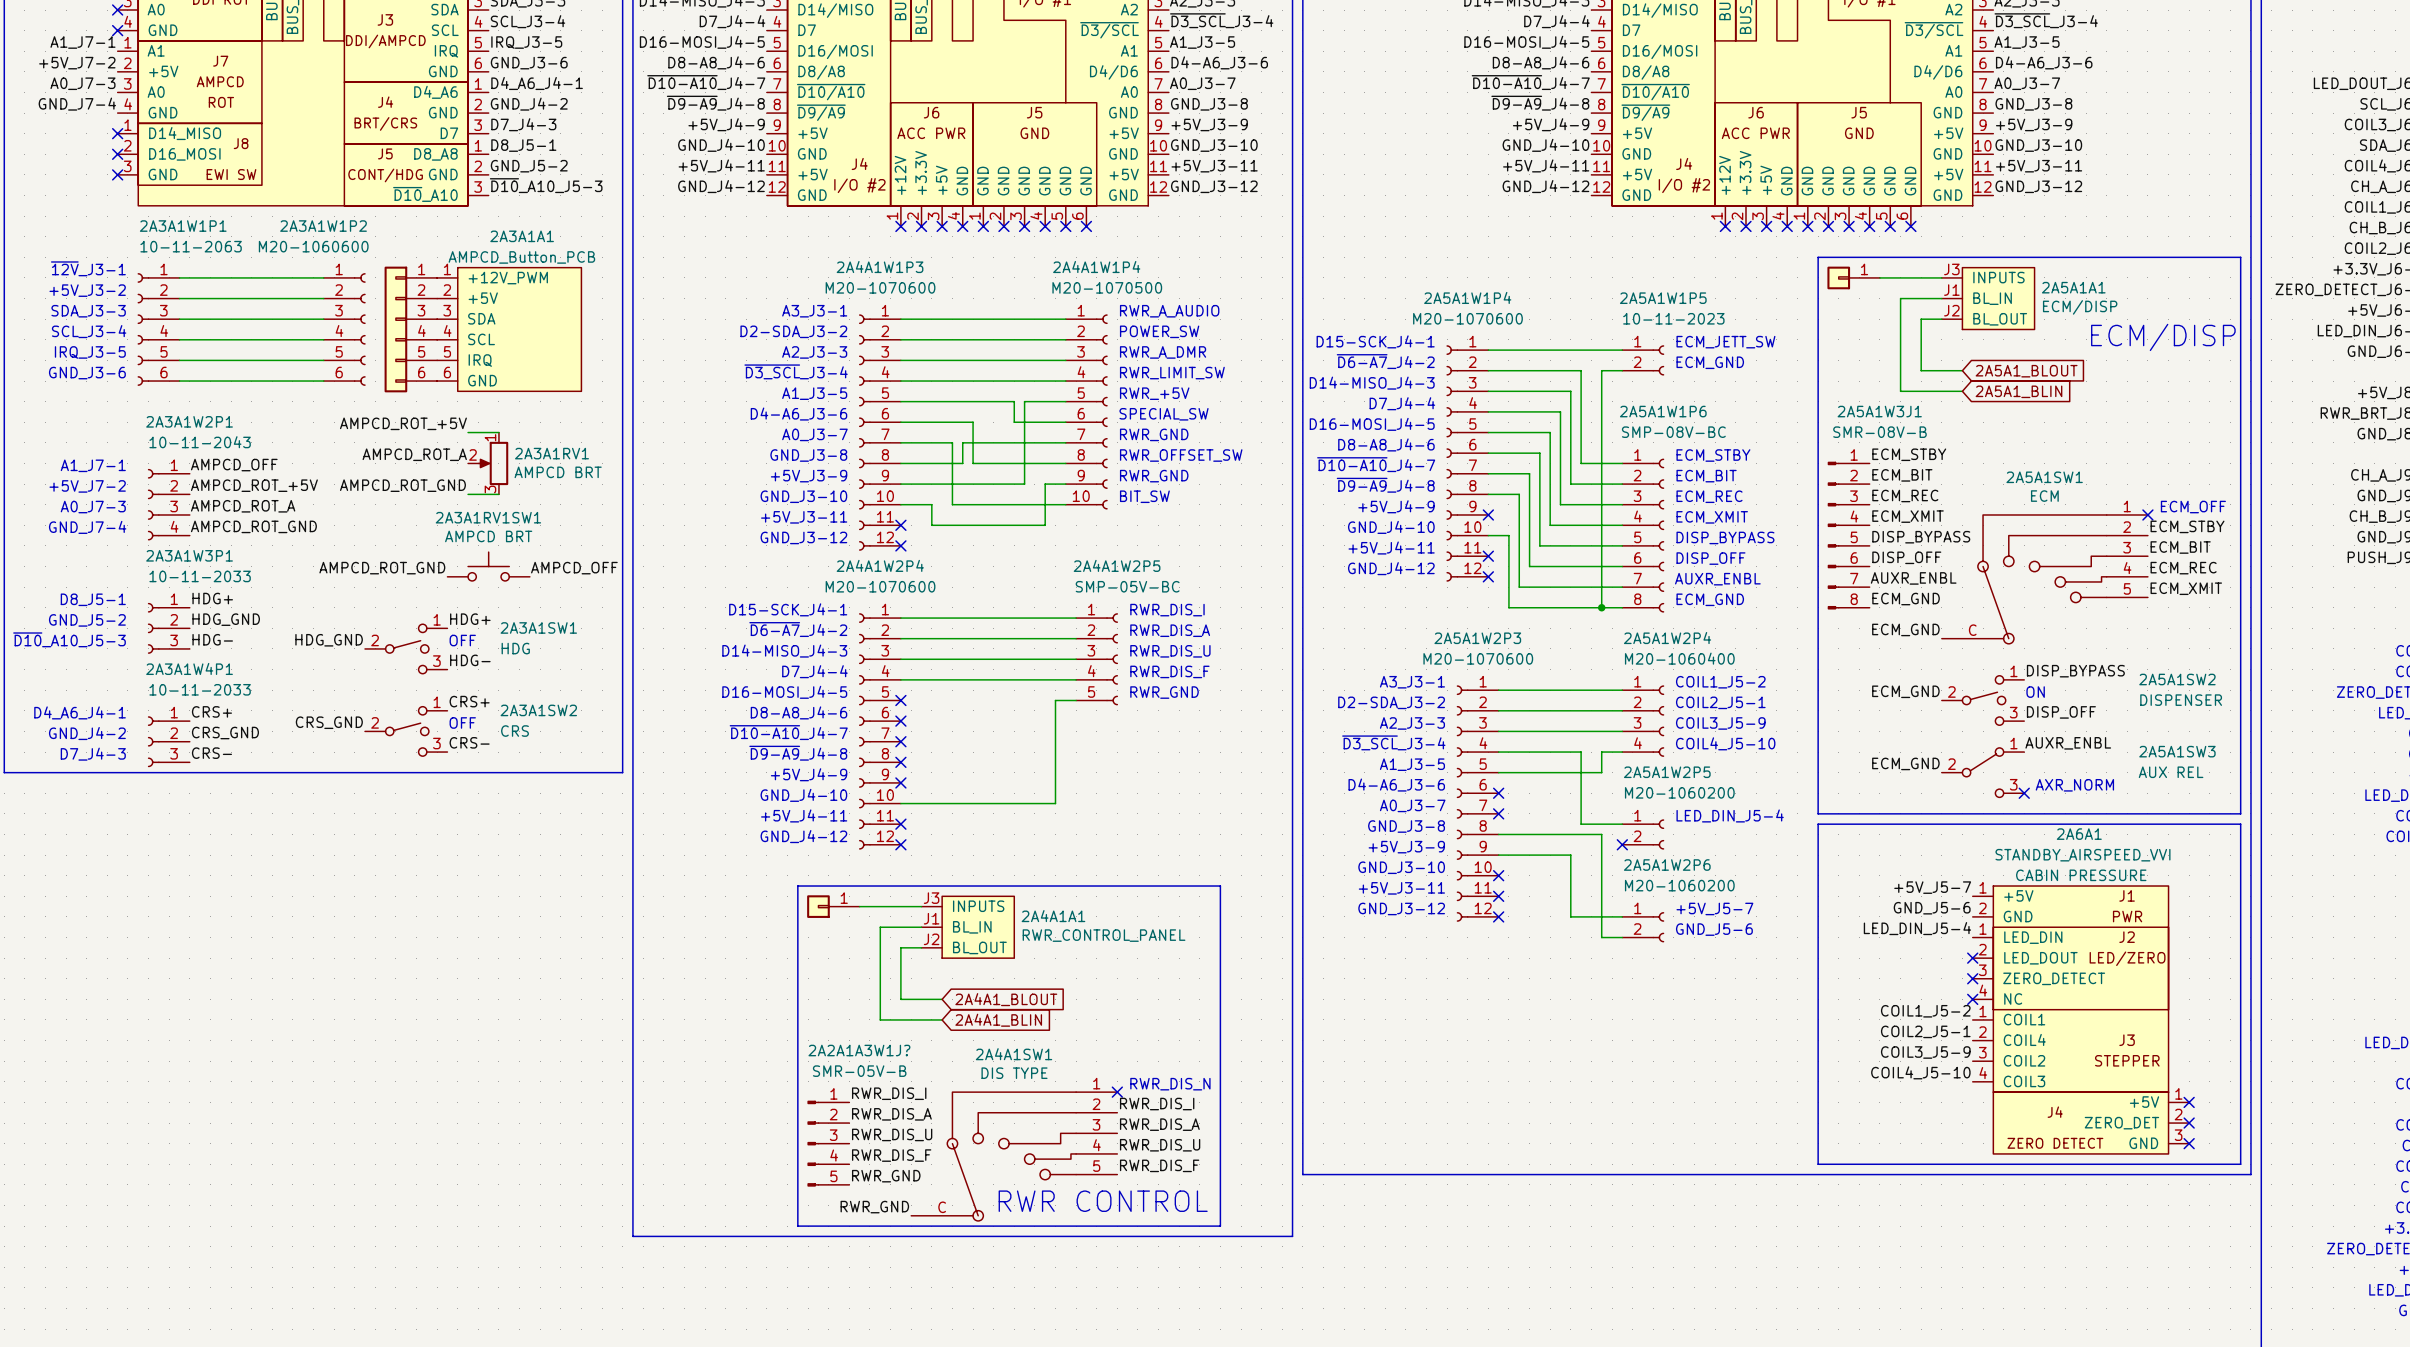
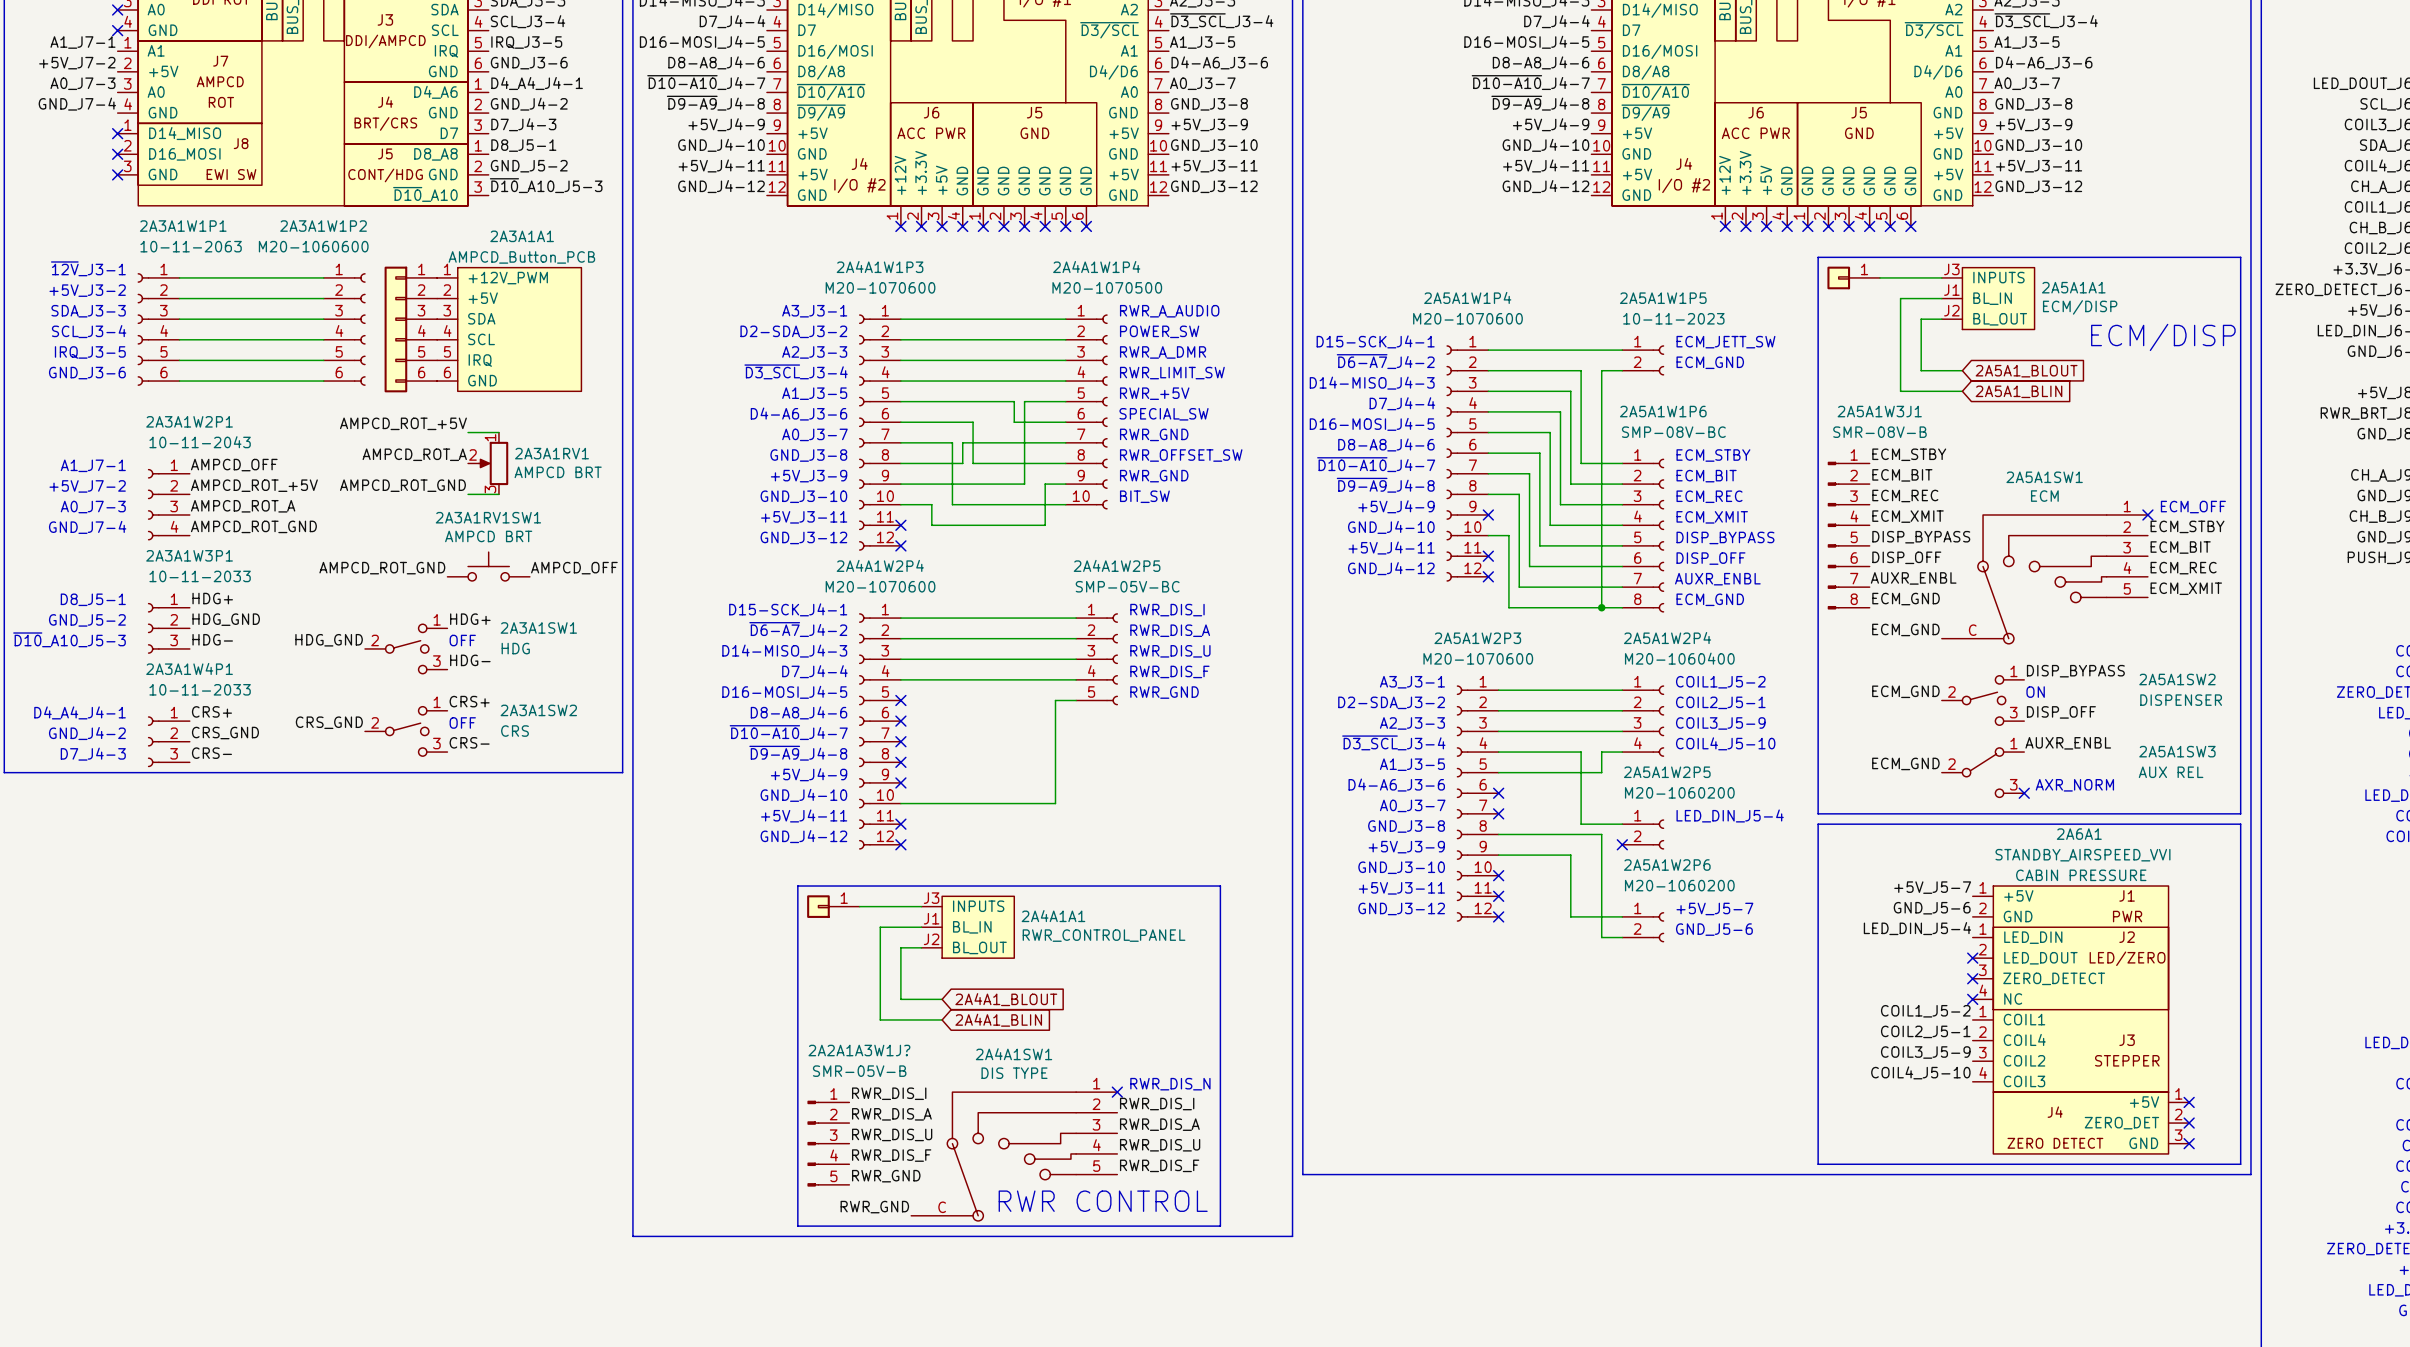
label: D4_A6_J4-1 (537, 83) -> D4_A4_J4-1 (537, 83)
text: D4_A6_J4-1 (80, 712) -> D4_A4_J4-1 (80, 712)

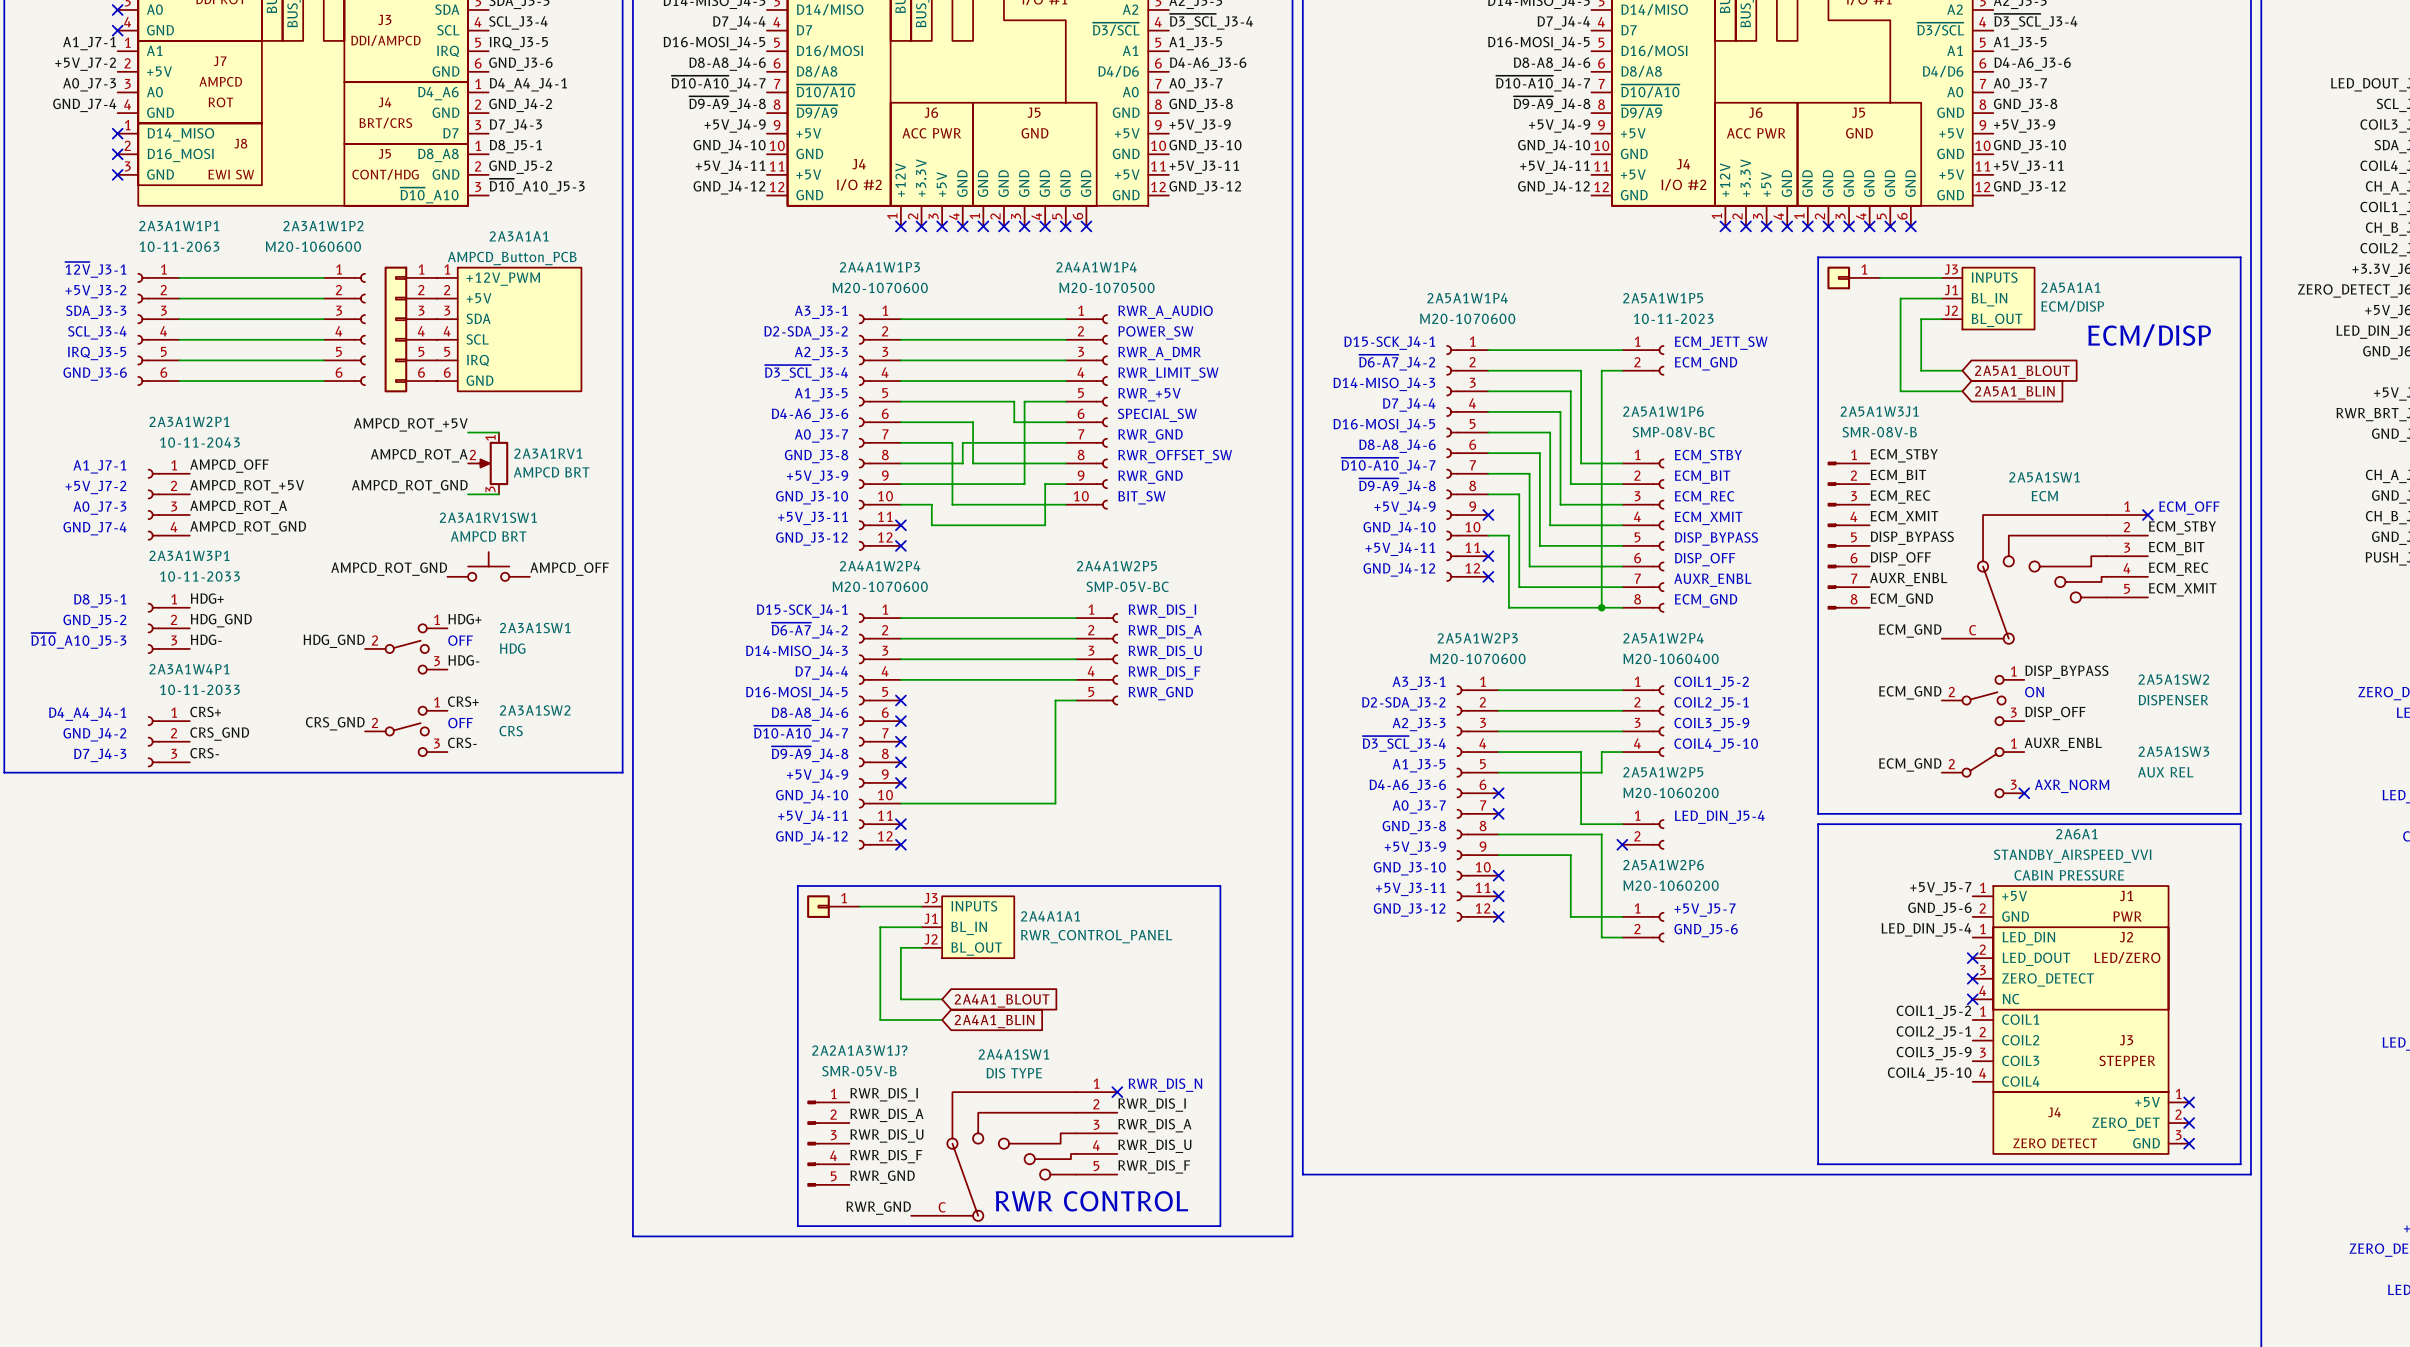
2A6A1 pin name: COIL4 (2024, 1039) -> COIL2 (2020, 1040)
2A6A1 pin name: COIL2 (2024, 1060) -> COIL3 (2020, 1060)
2A6A1 pin name: COIL3 (2024, 1081) -> COIL4 (2020, 1081)

